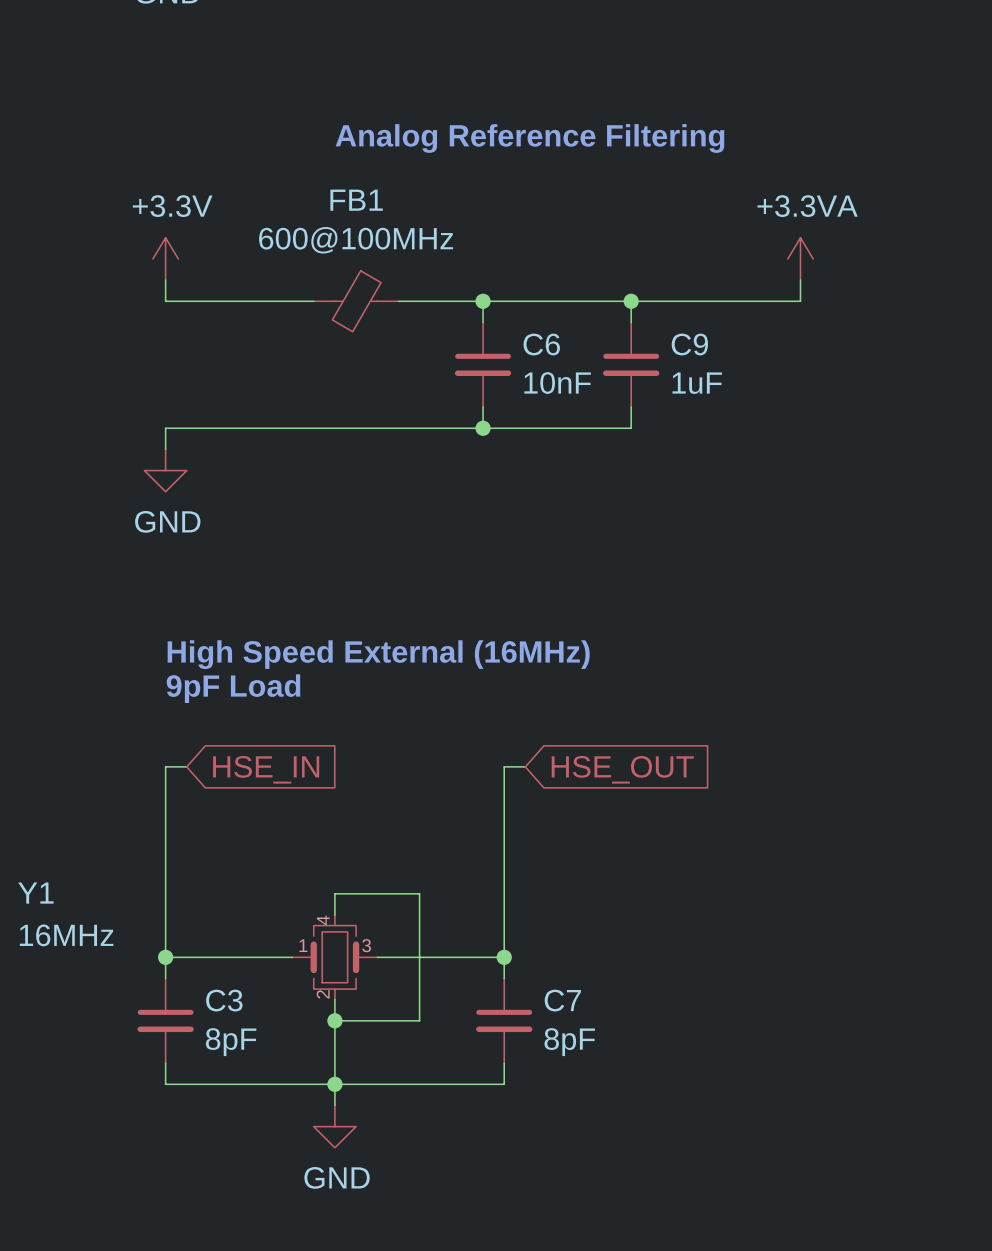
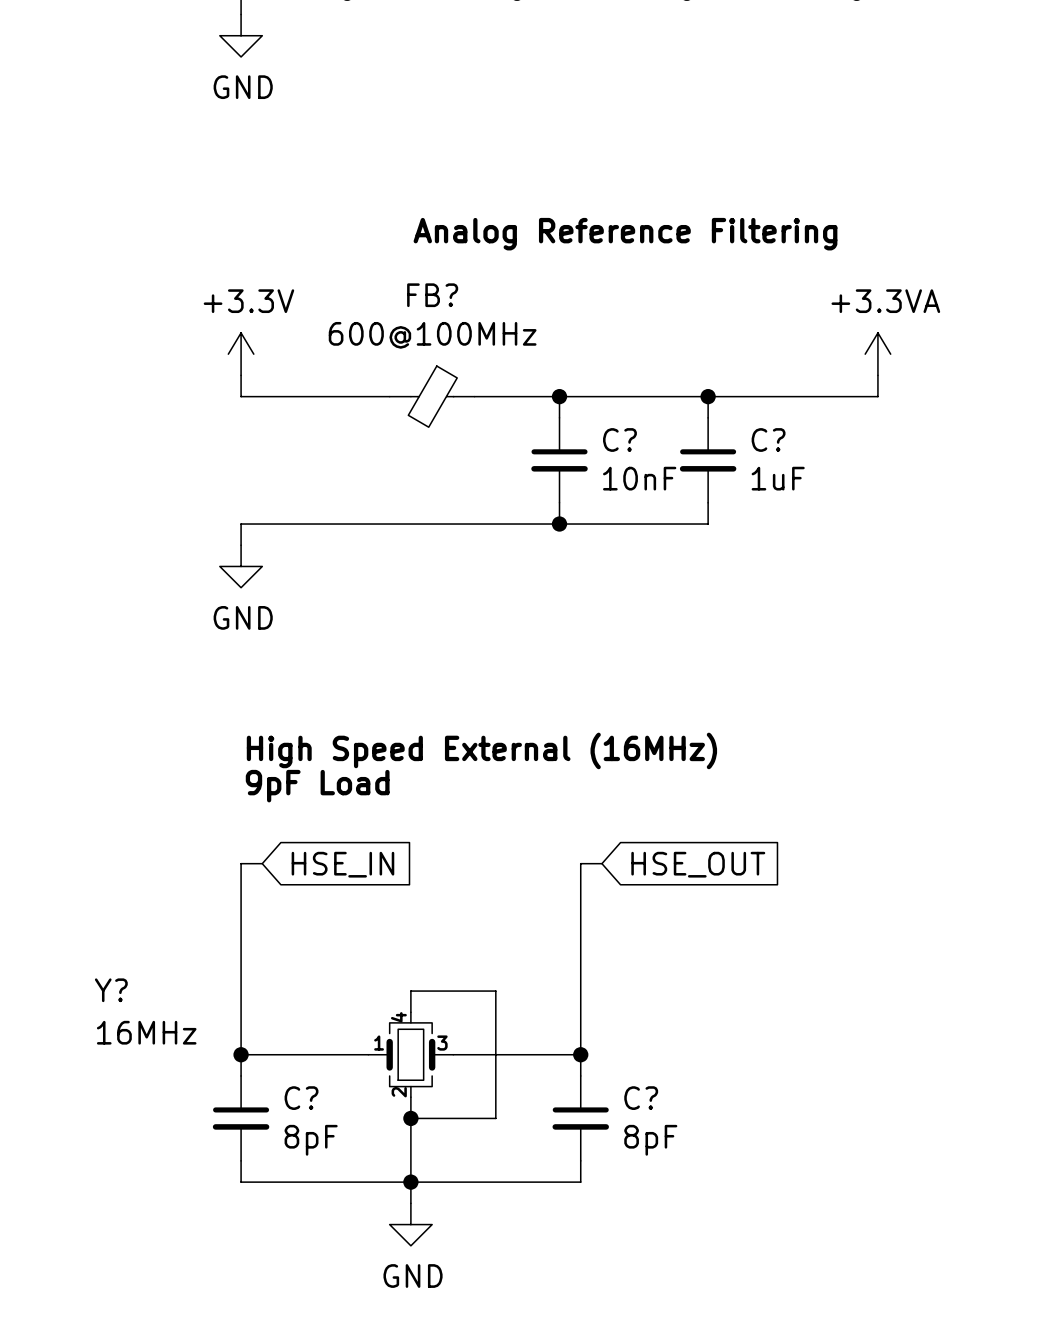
FB1 name: FB1 (356, 200) -> FB? (432, 295)
C6 name: C6 (541, 344) -> C? (619, 440)
C9 name: C9 (689, 344) -> C? (768, 440)
Y1 name: Y1 (35, 893) -> Y? (111, 990)
C3 name: C3 (224, 1000) -> C? (301, 1098)
C7 name: C7 (562, 1000) -> C? (641, 1098)

